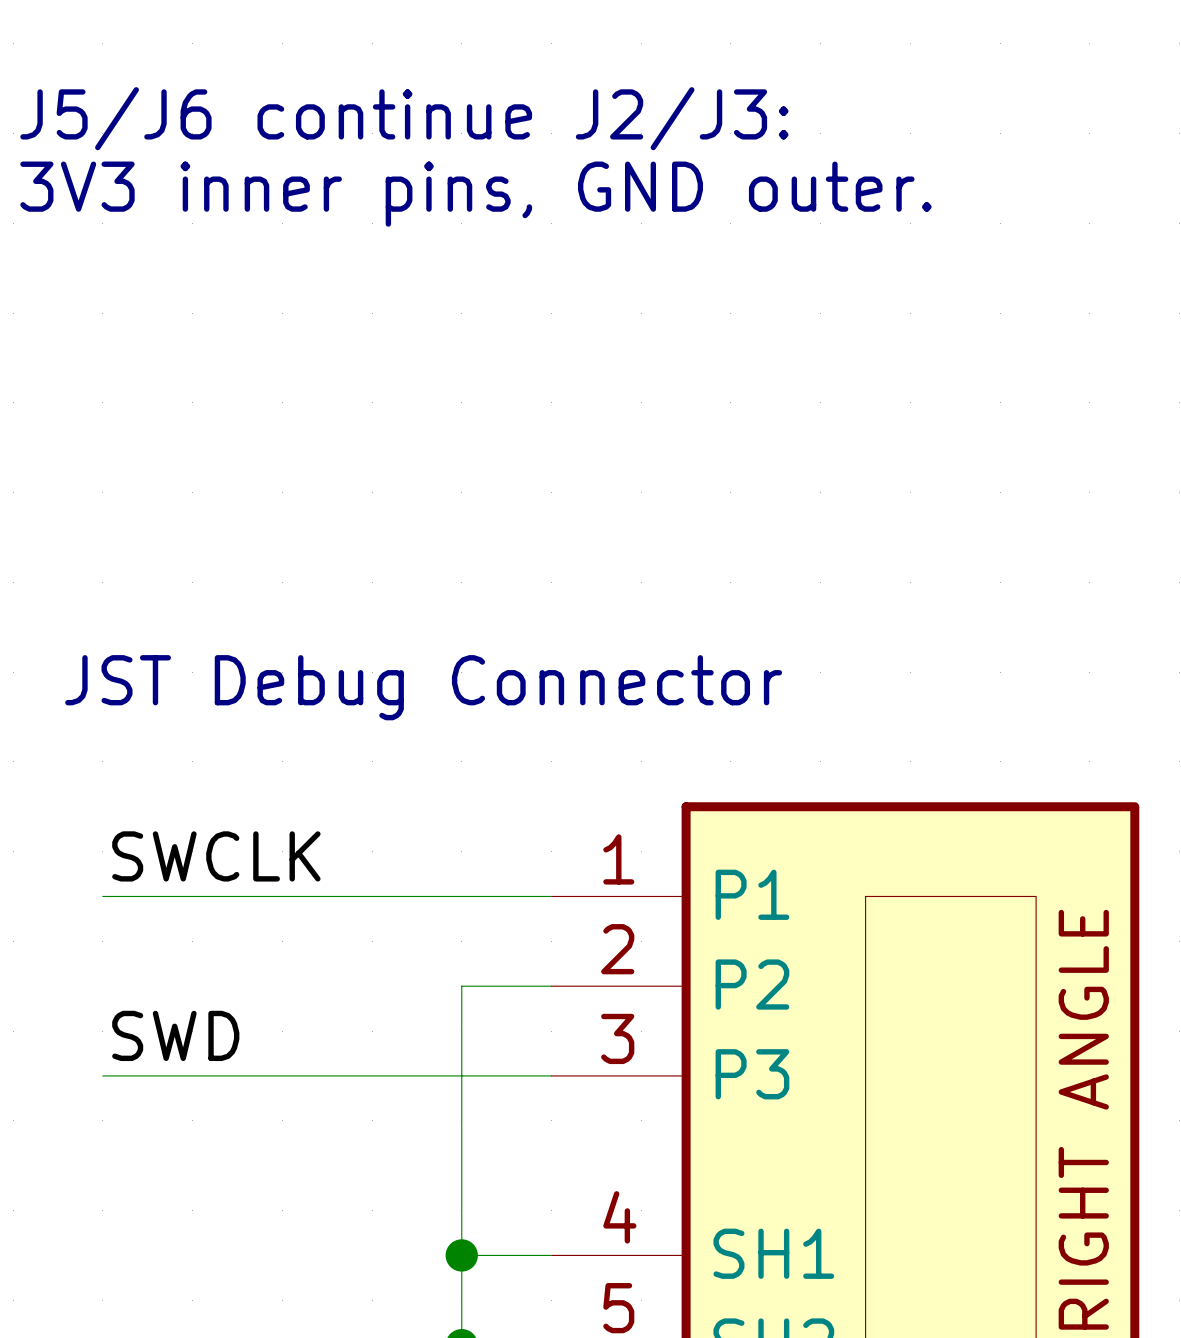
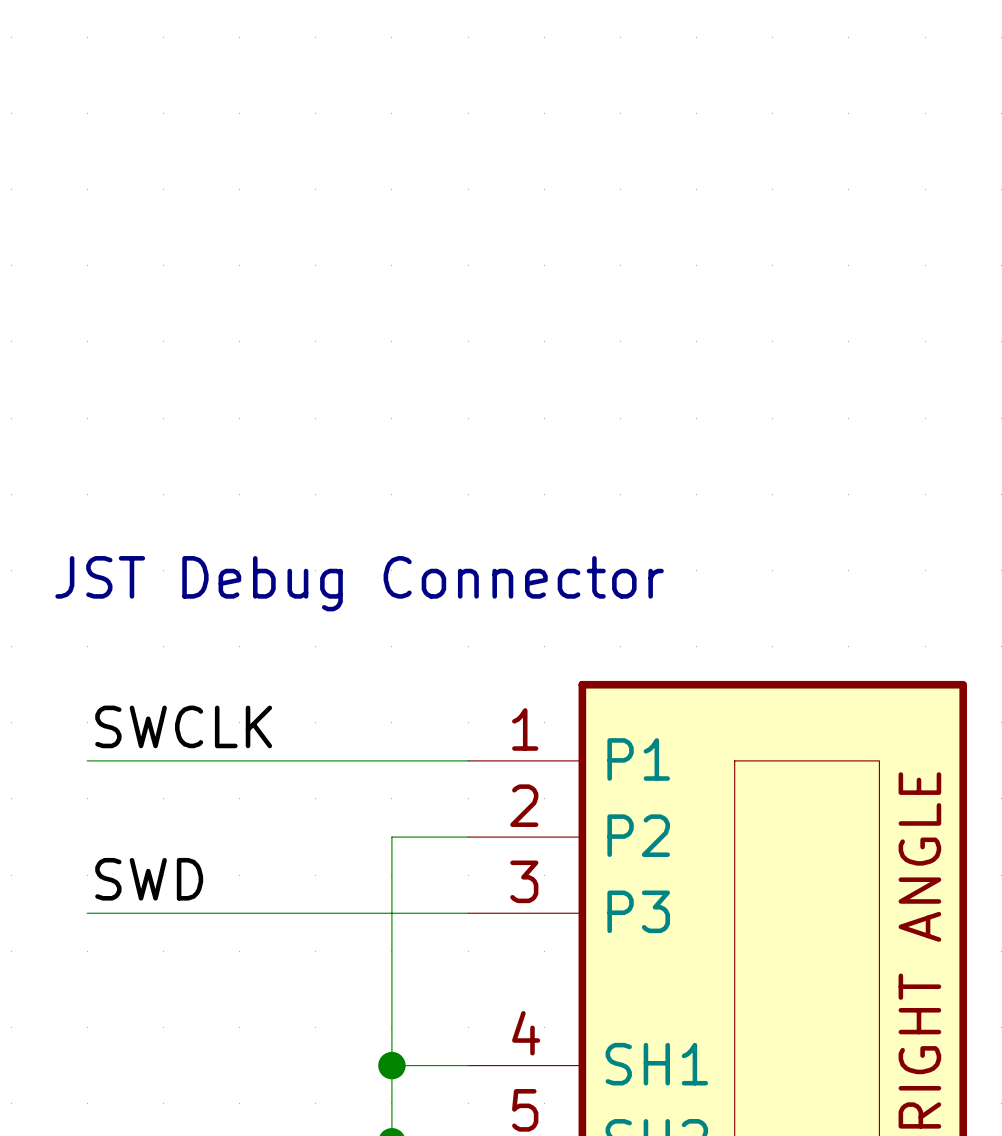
text: J5/J6 continue J2/J3: (404, 118) -> none
text: 3V3 inner pins, GND outer. (475, 194) -> none

